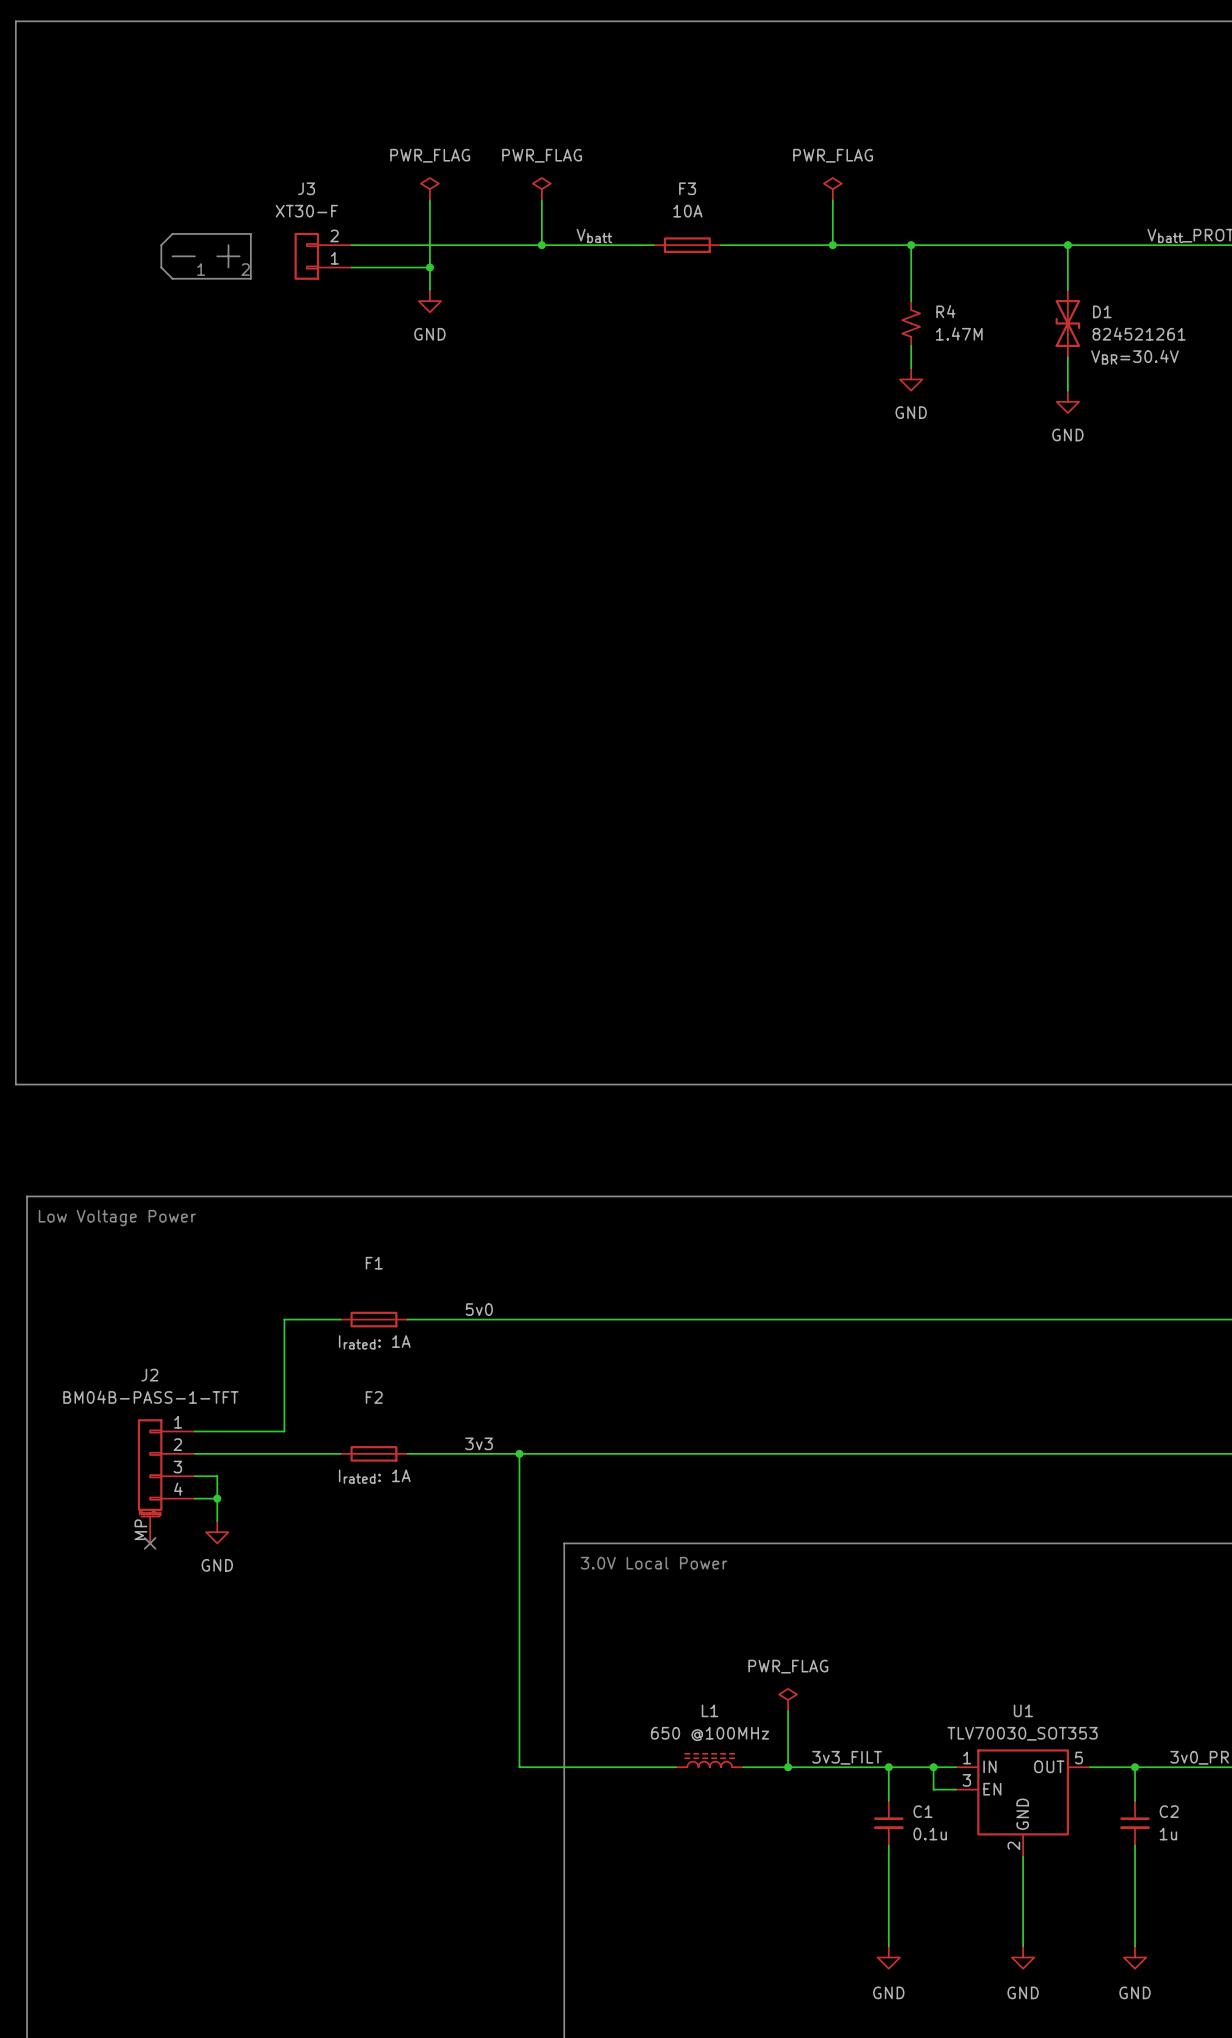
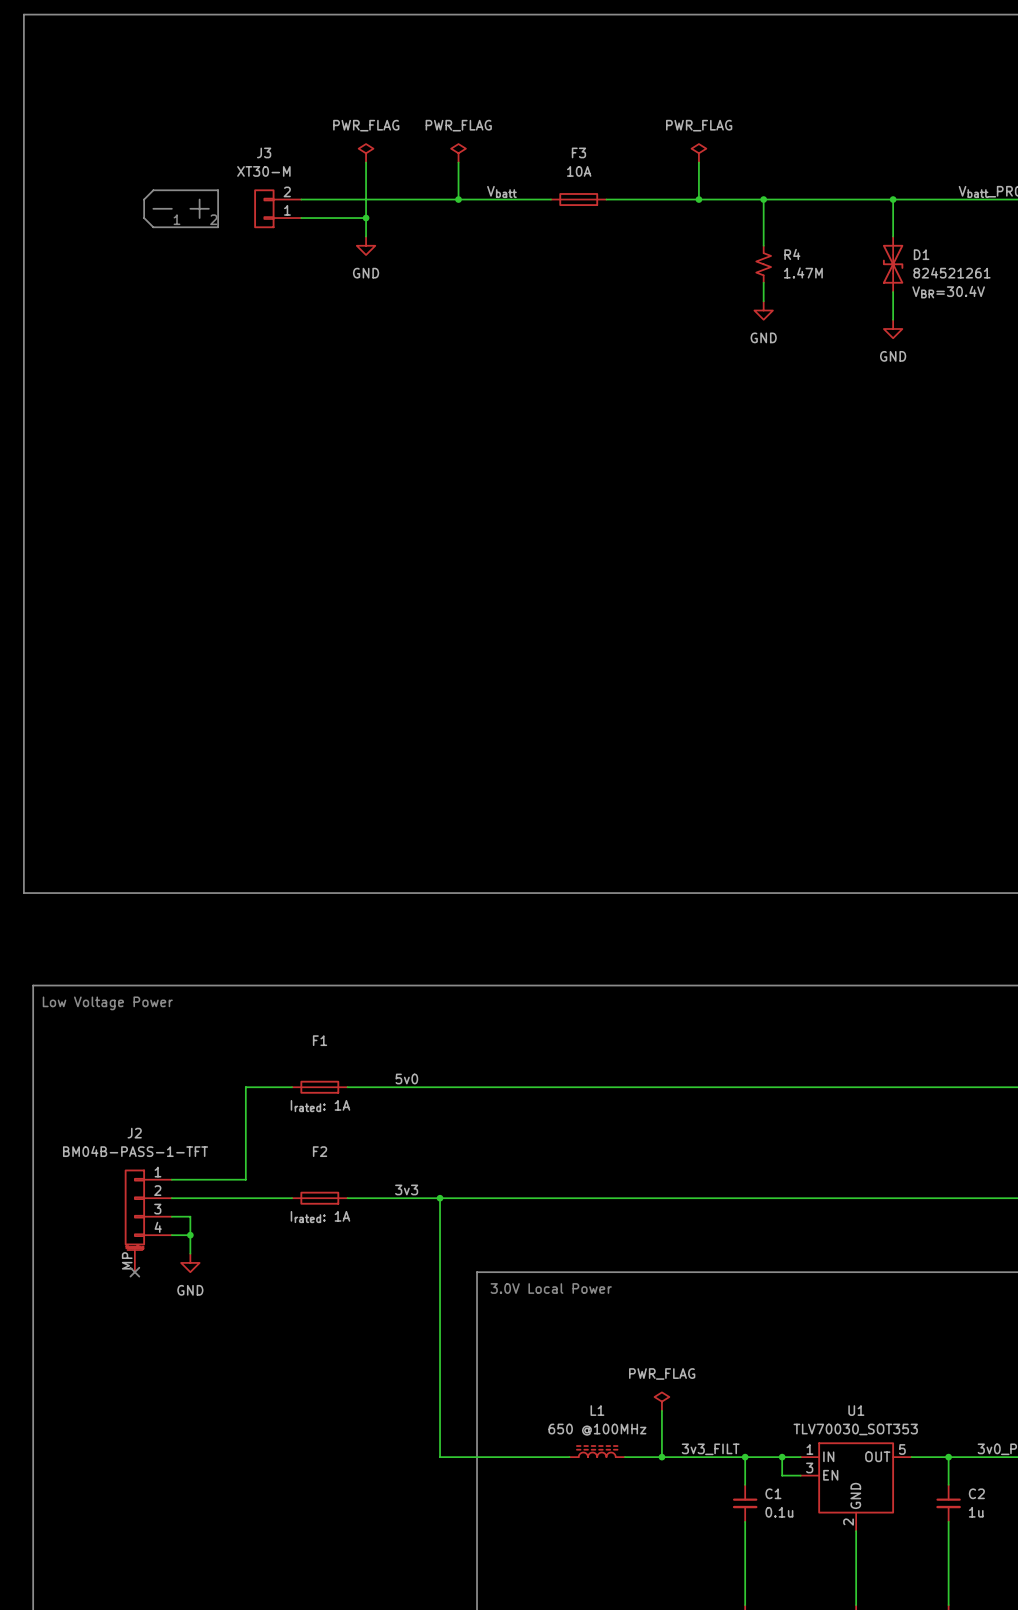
J3 value: XT30-F (306, 211) -> XT30-M (263, 171)

